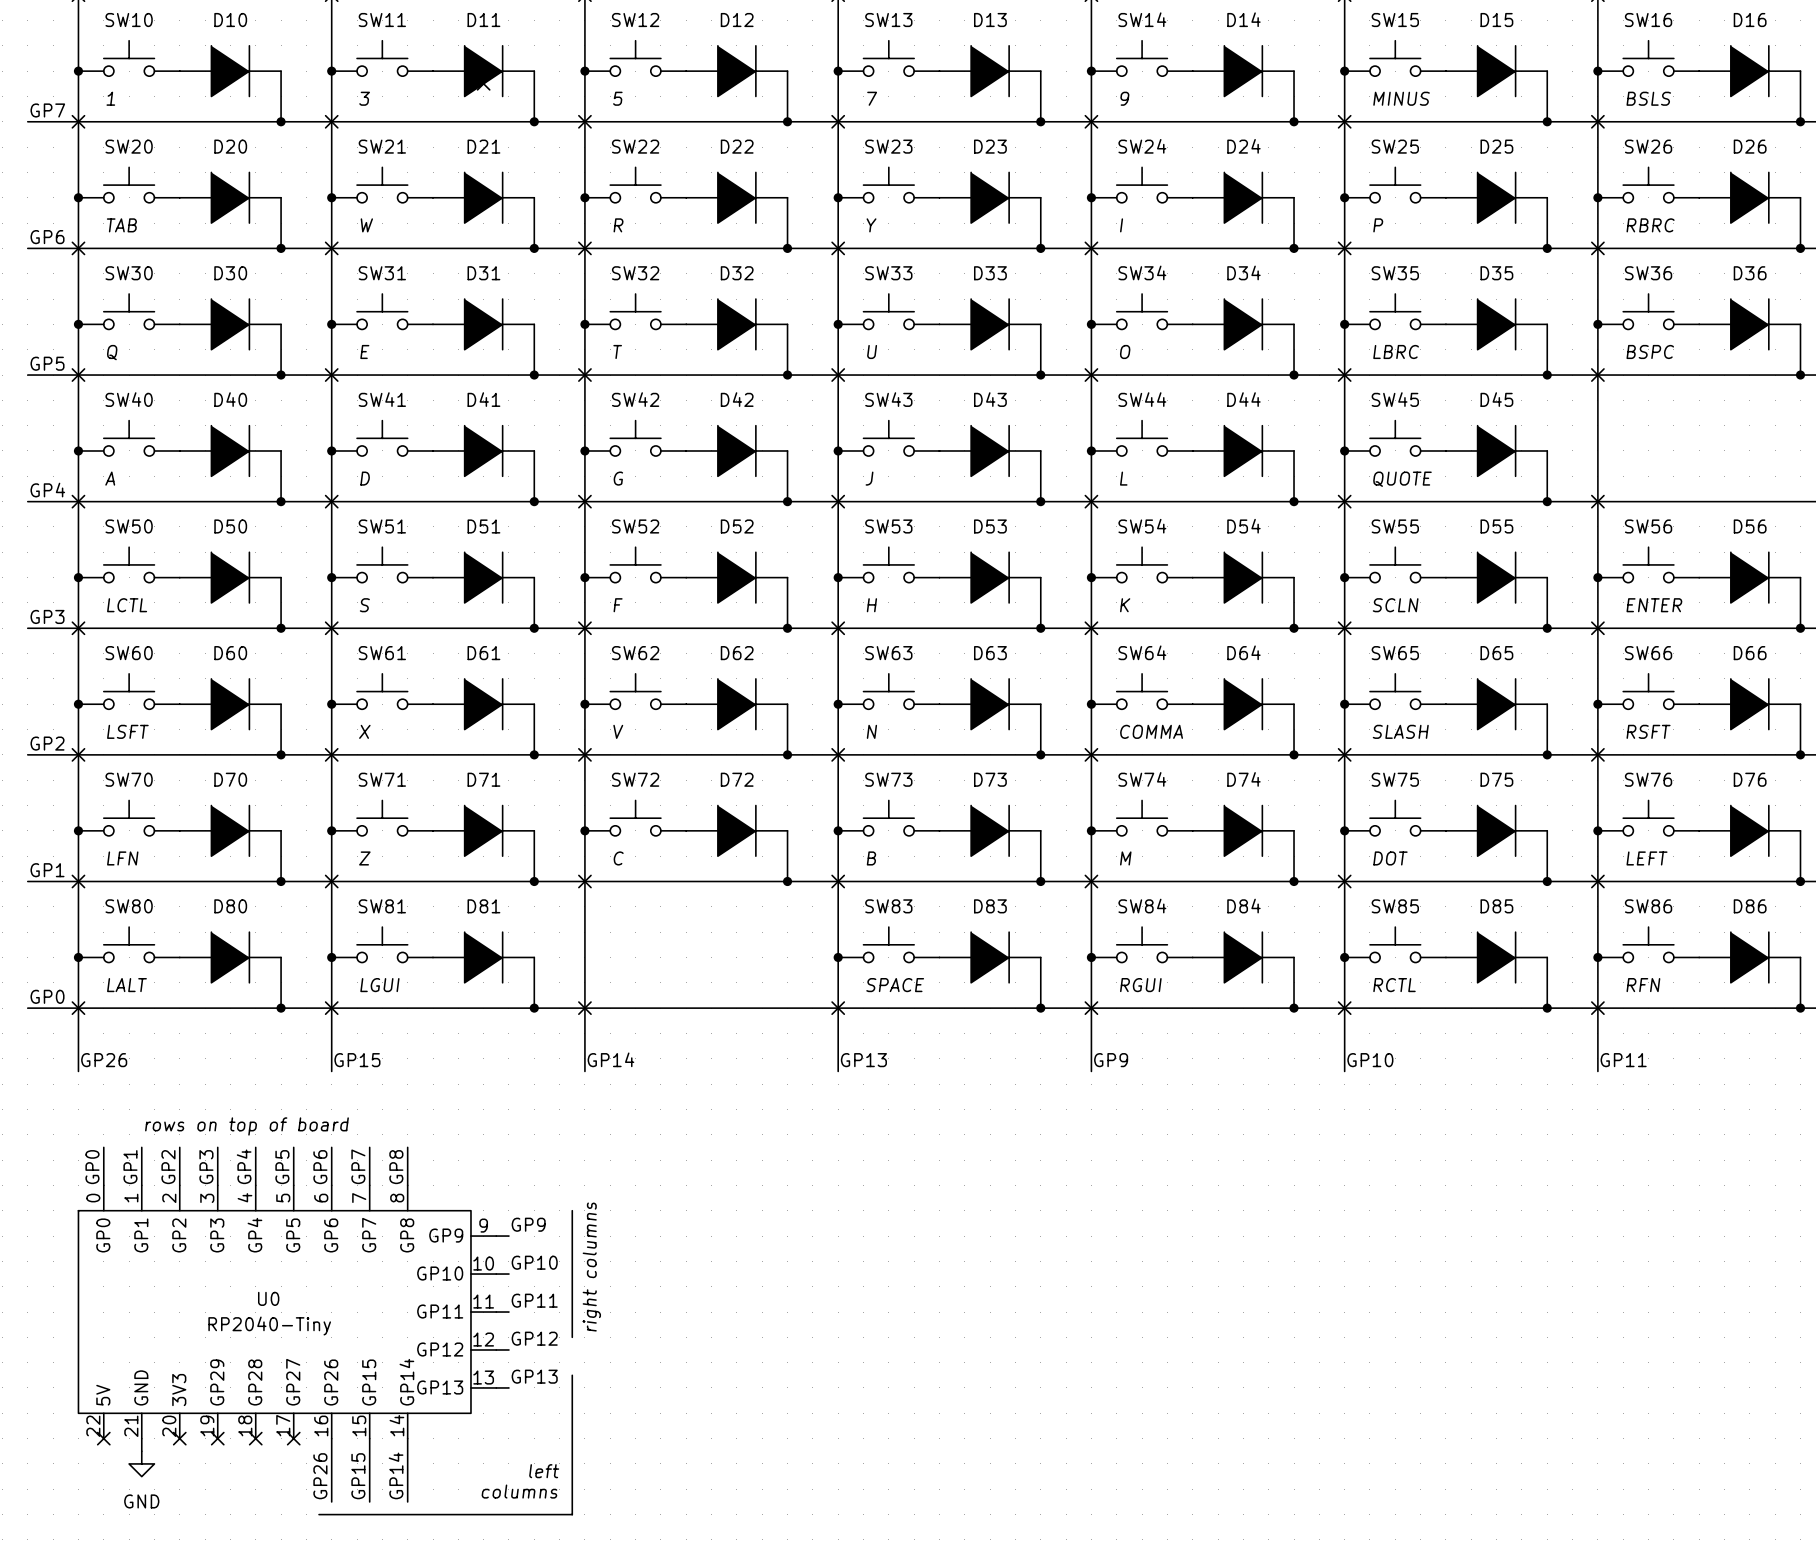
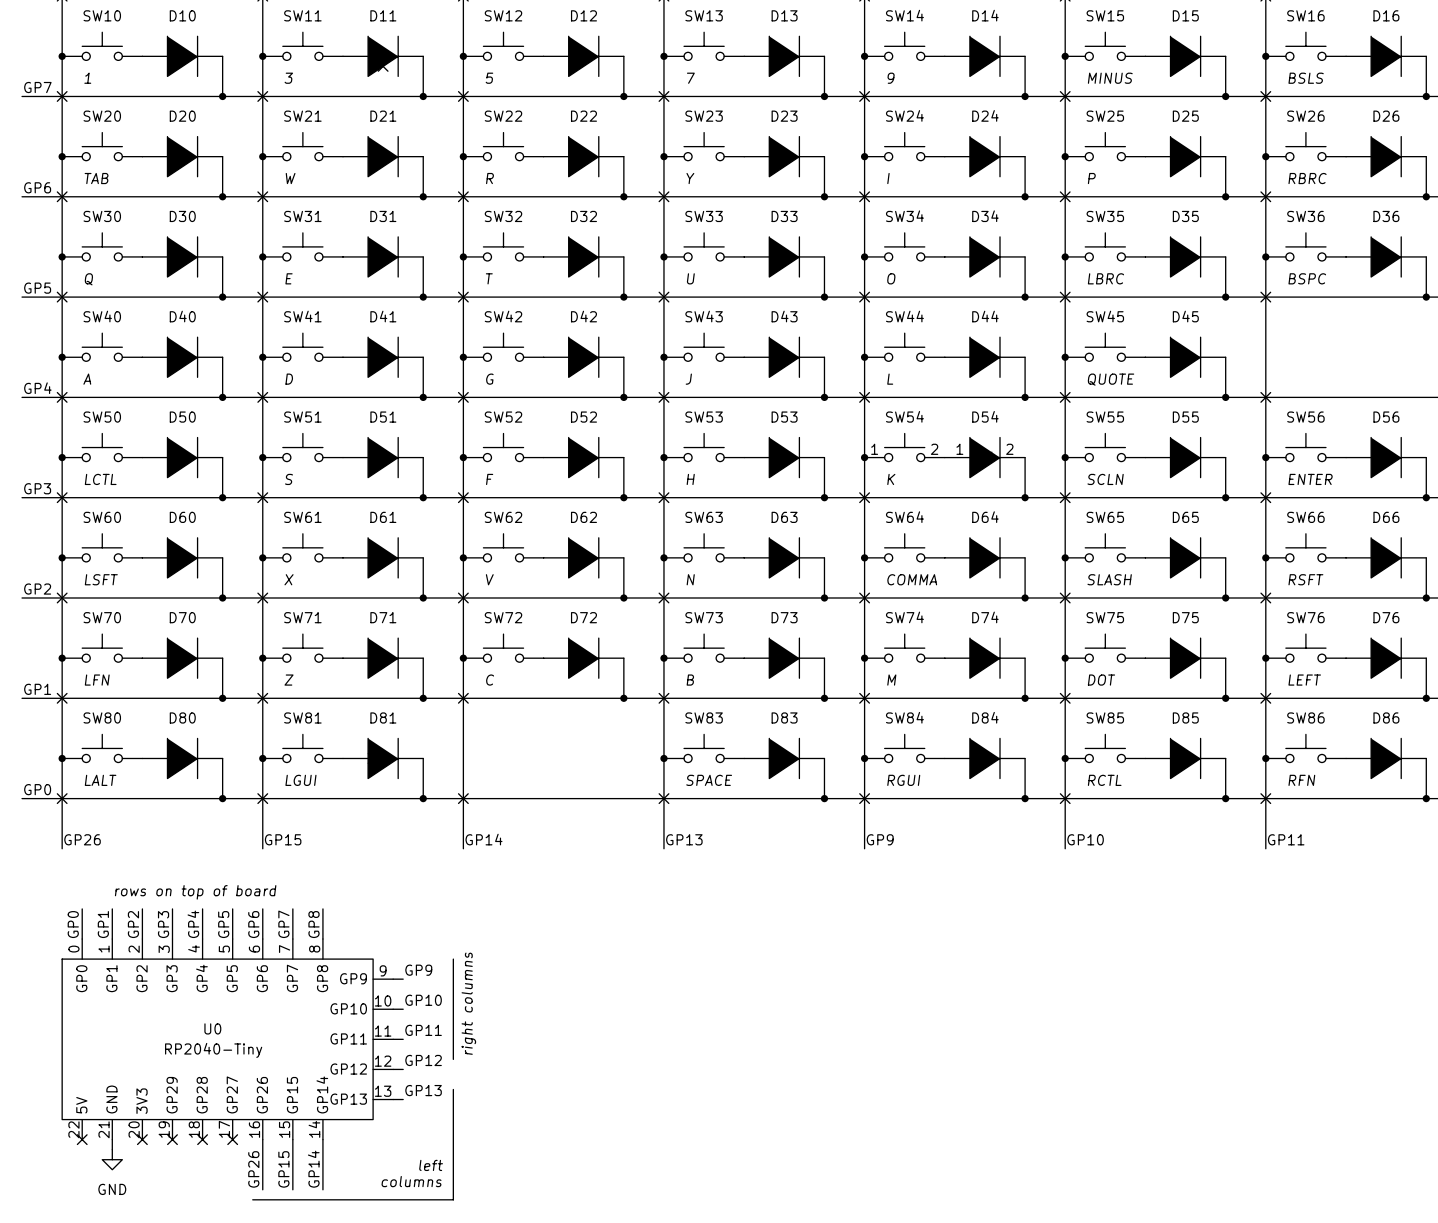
SW54 pin number: none -> 1 (874, 449)
SW54 pin number: none -> 2 (934, 449)
D54 pin number: none -> 1 (959, 449)
D54 pin number: none -> 2 (1009, 449)

